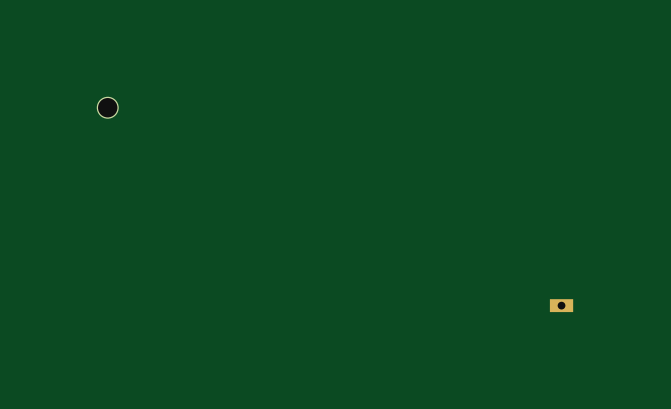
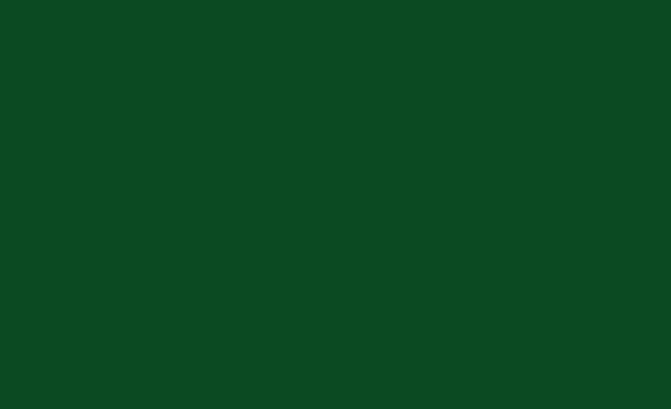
part: (107, 107) -> none
part: (561, 305) -> none

